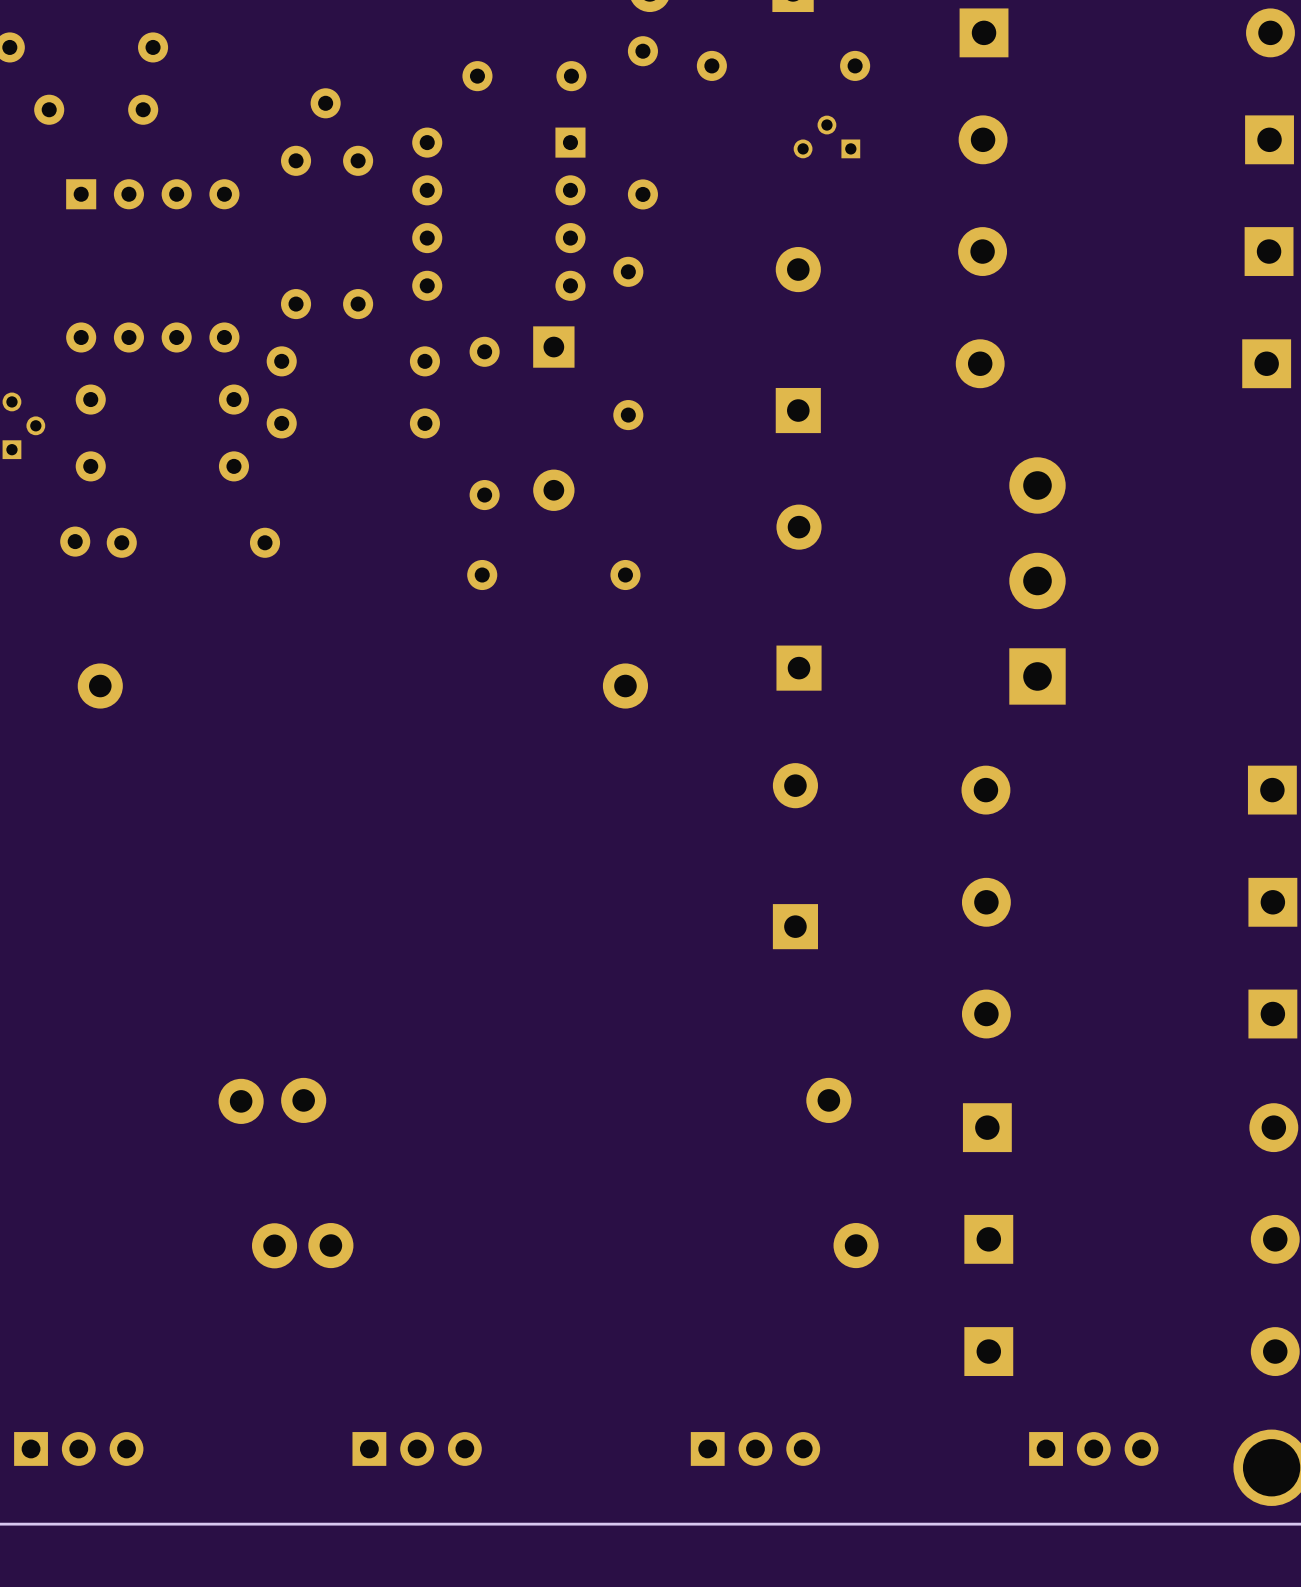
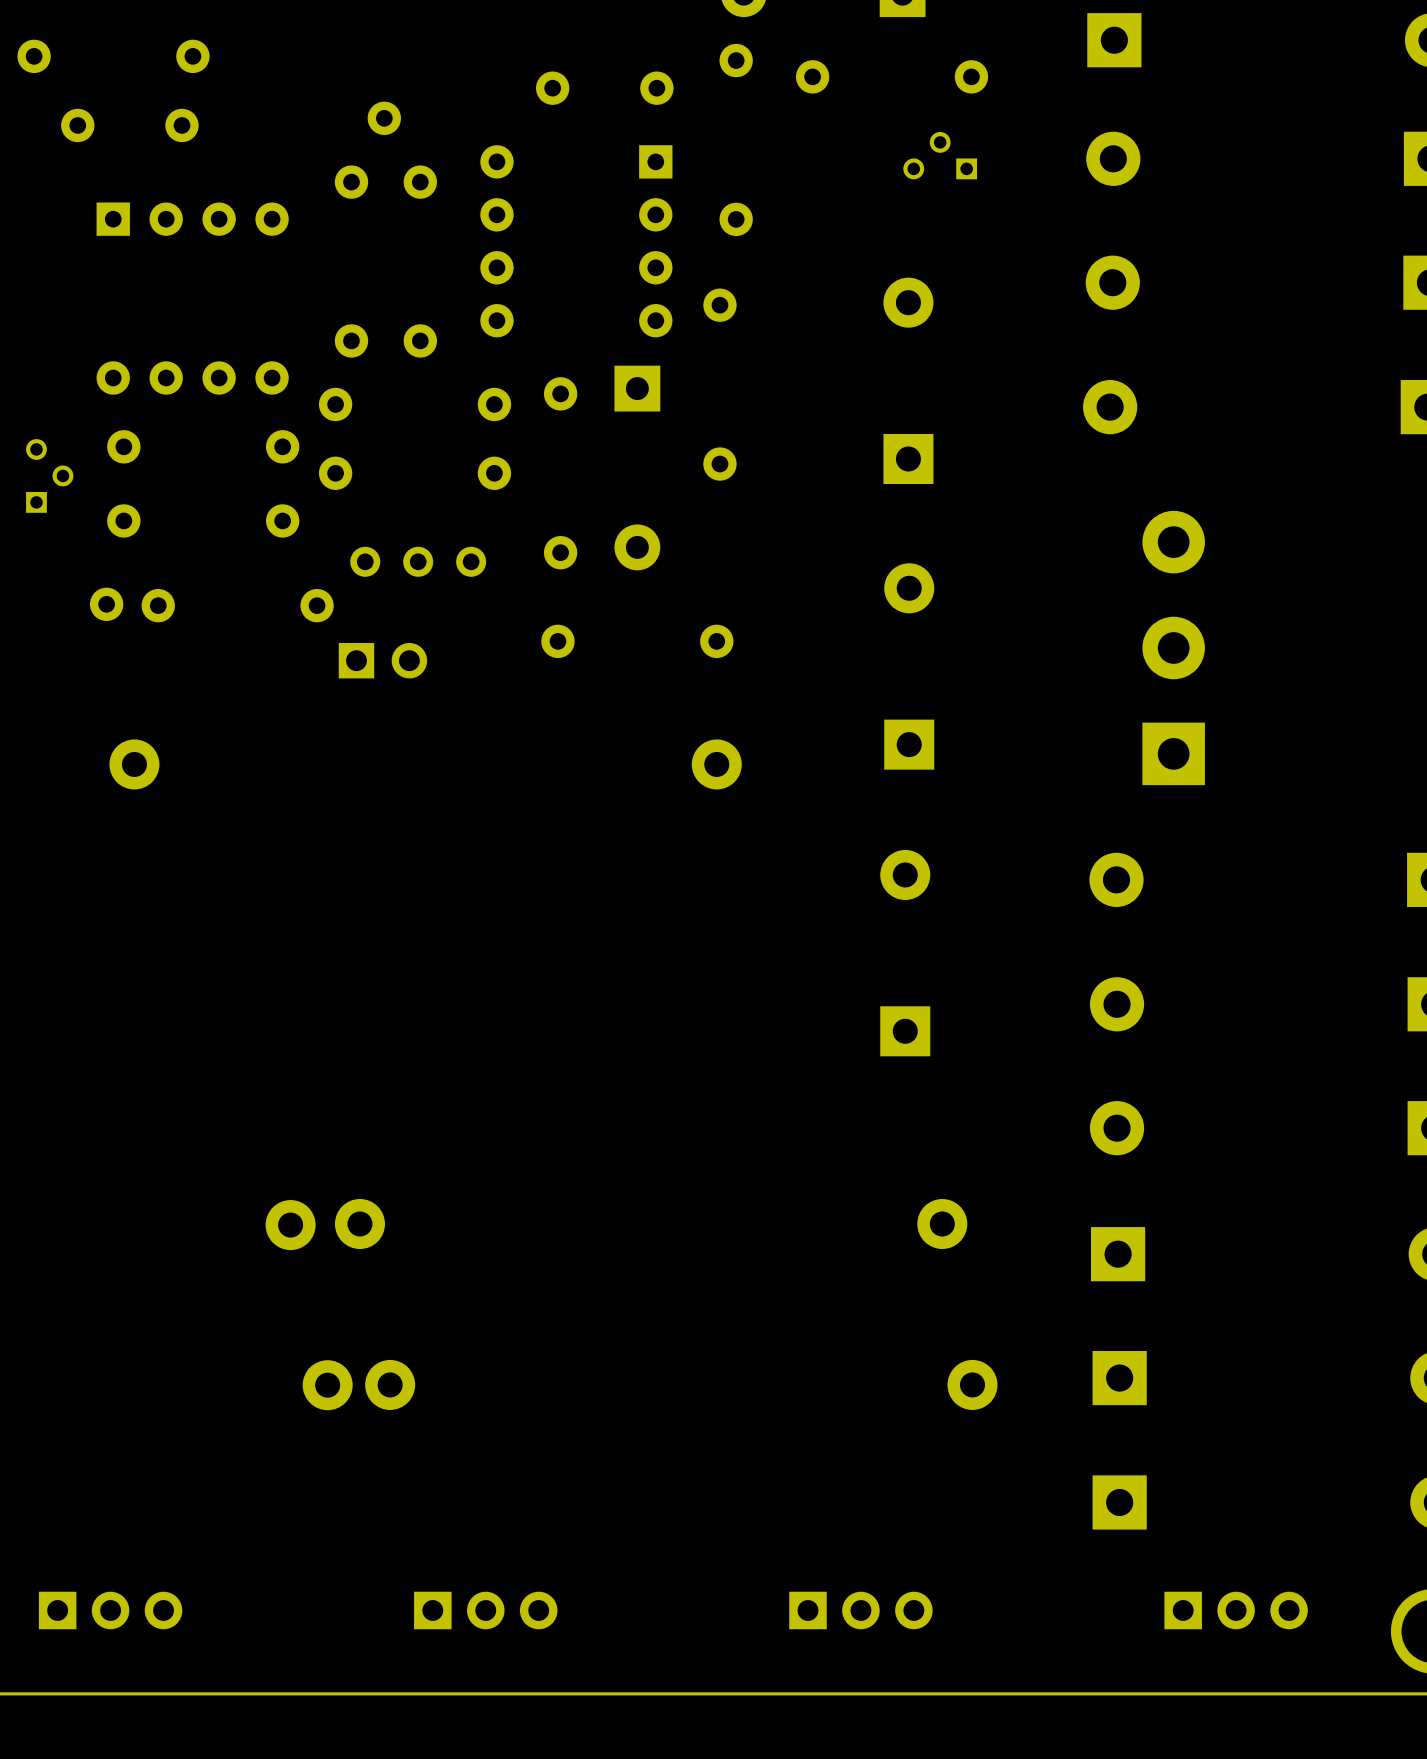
part: none -> (418, 561)
part: none -> (382, 660)

